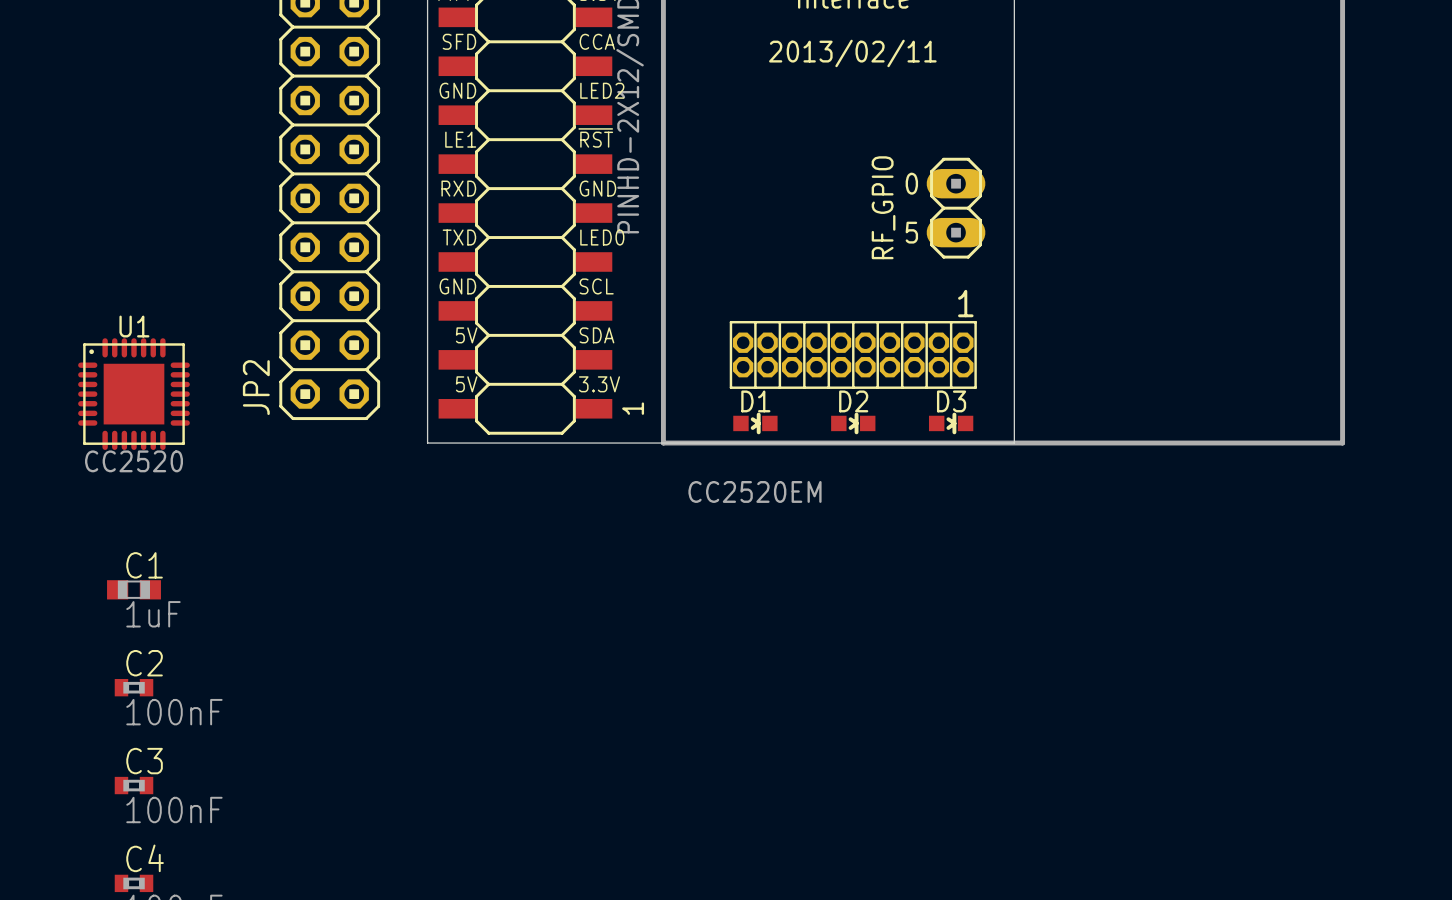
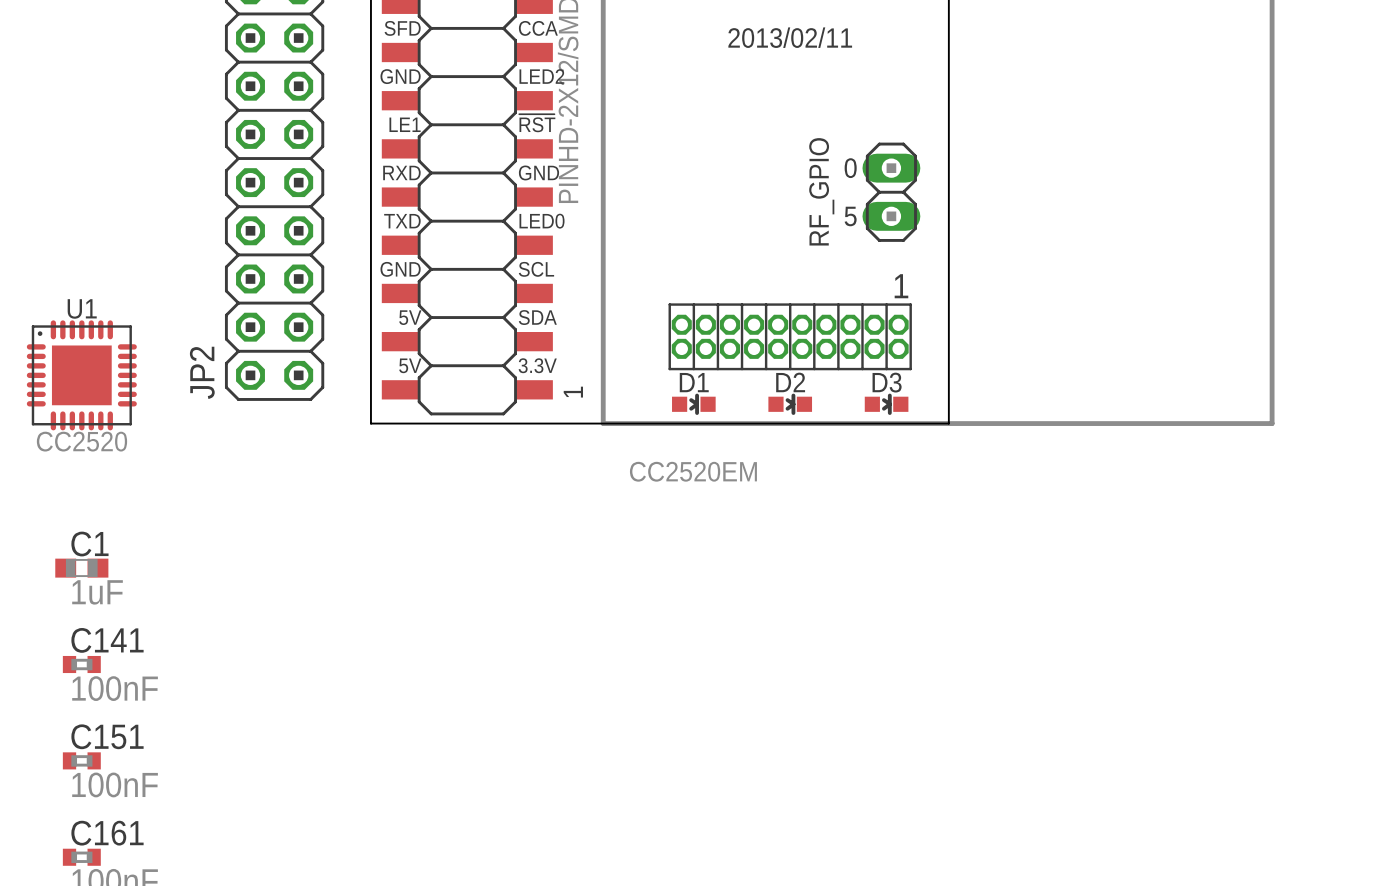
C2 name: C2 (144, 663) -> C141 (107, 640)
C3 name: C3 (144, 761) -> C151 (107, 736)
C4 name: C4 (145, 858) -> C161 (107, 833)

